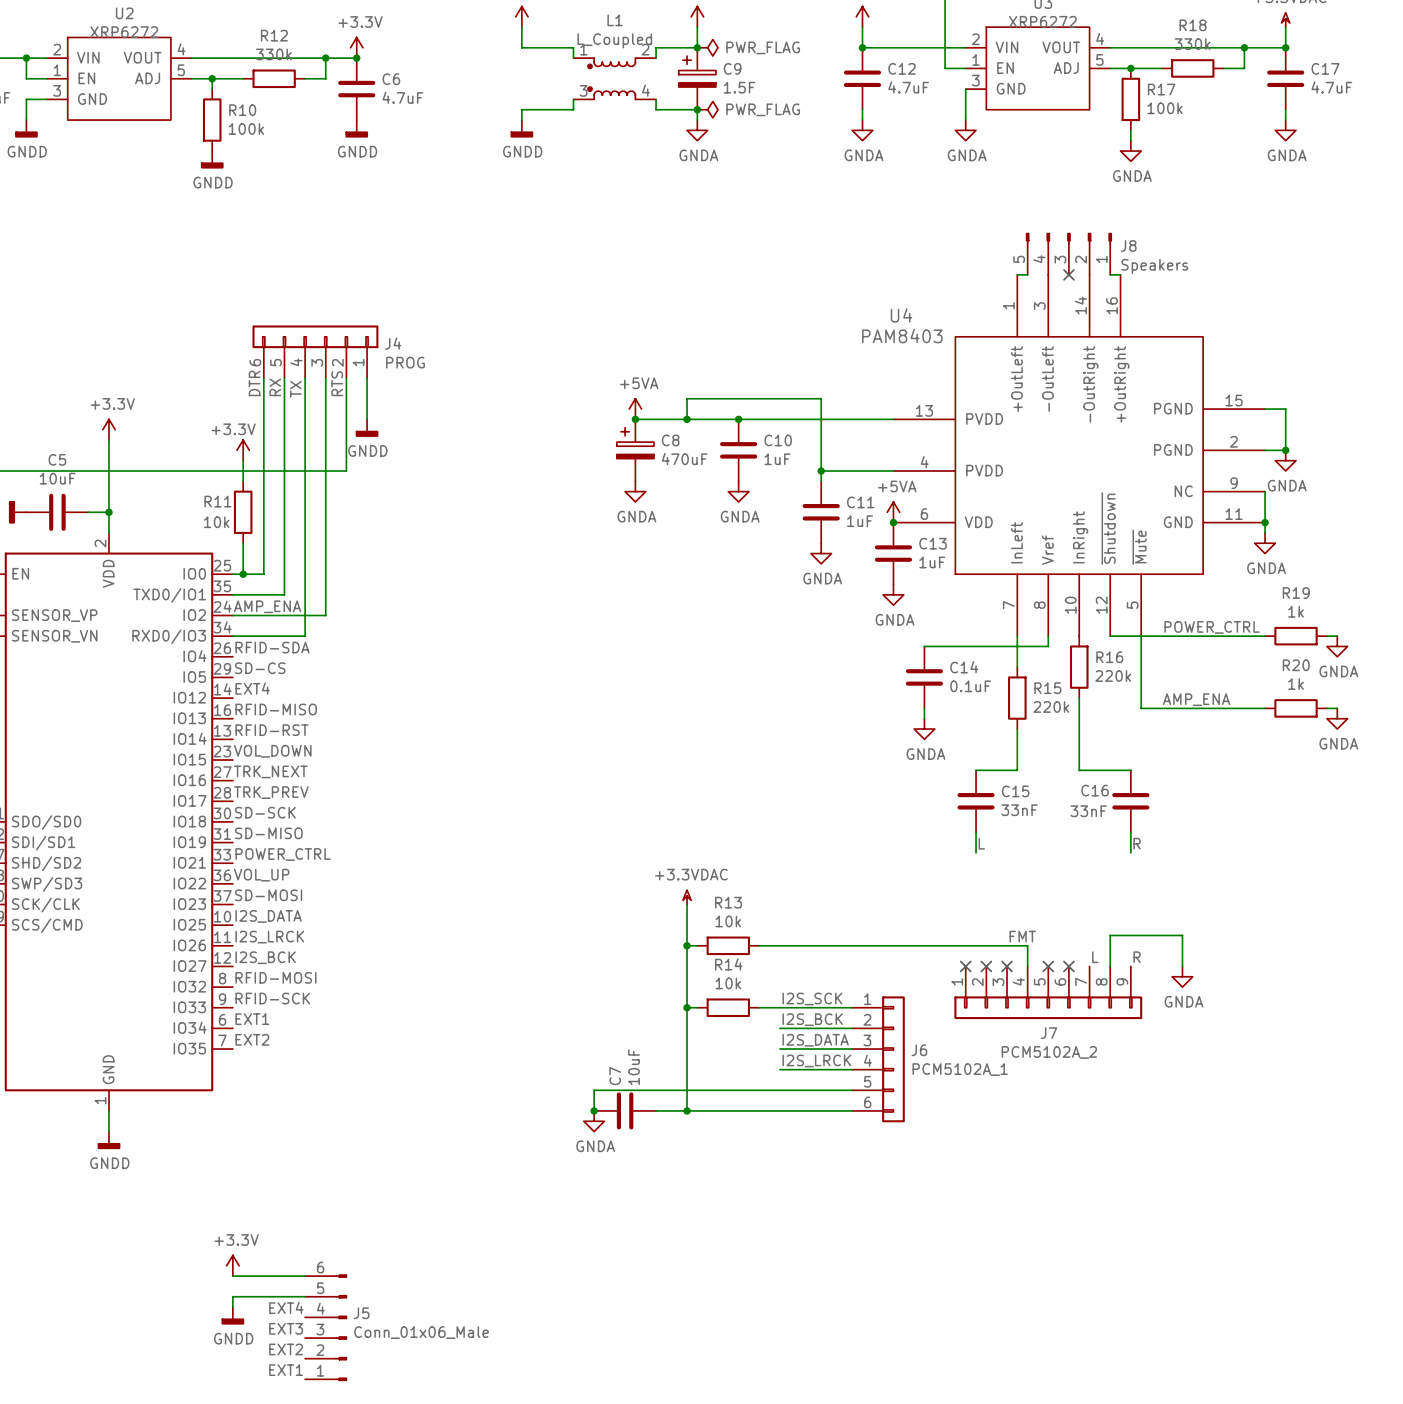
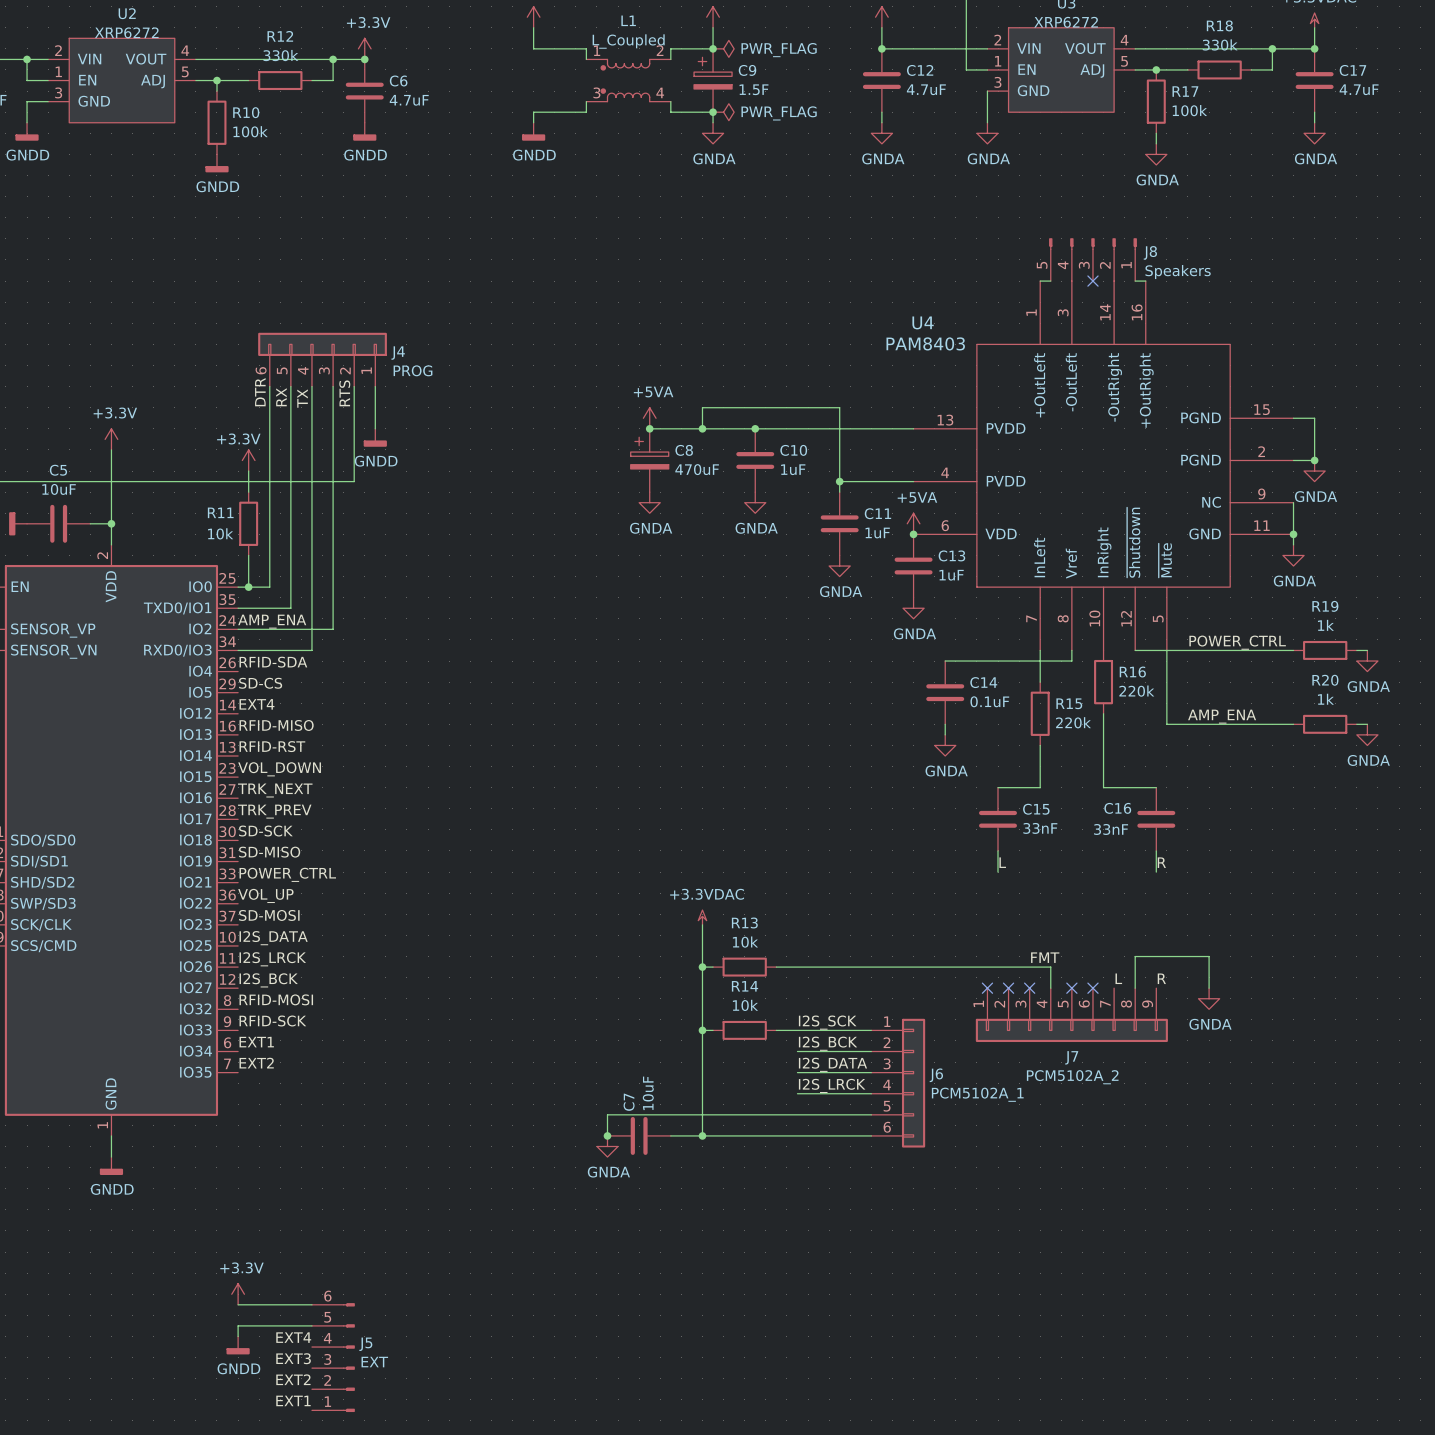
J5 value: Conn_01x06_Male (421, 1332) -> EXT (374, 1362)

